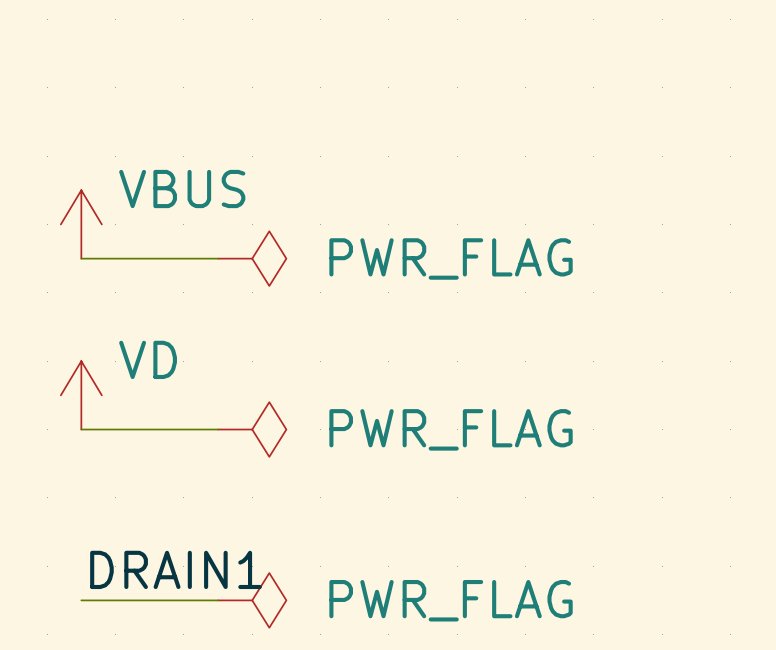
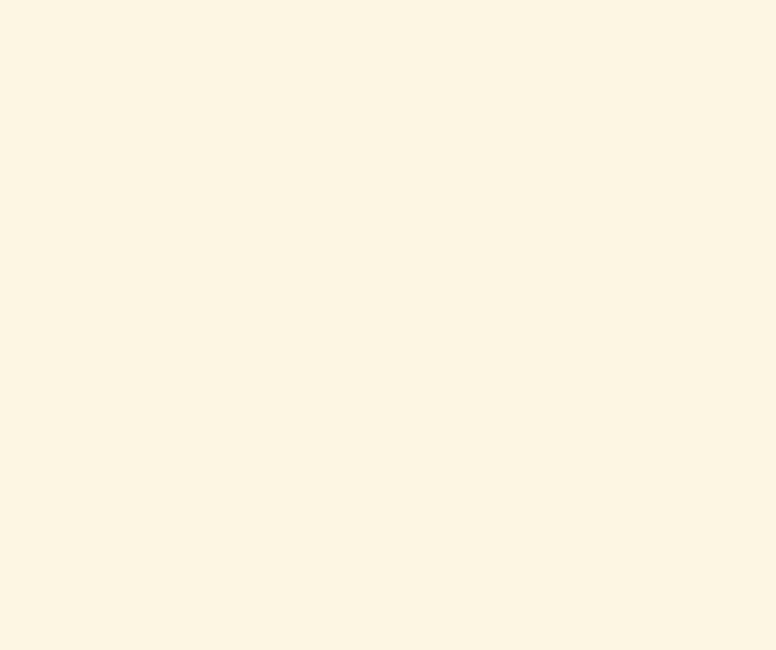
power symbol: VBUS (81, 224) -> none
wire: (81, 258) (218, 258) -> none
power symbol: PWR_FLAG (252, 258) -> none
power symbol: VD (81, 395) -> none
wire: (81, 429) (218, 429) -> none
power symbol: PWR_FLAG (252, 429) -> none
label: DRAIN1 (175, 569) -> none
wire: (81, 600) (218, 600) -> none
power symbol: PWR_FLAG (252, 600) -> none

